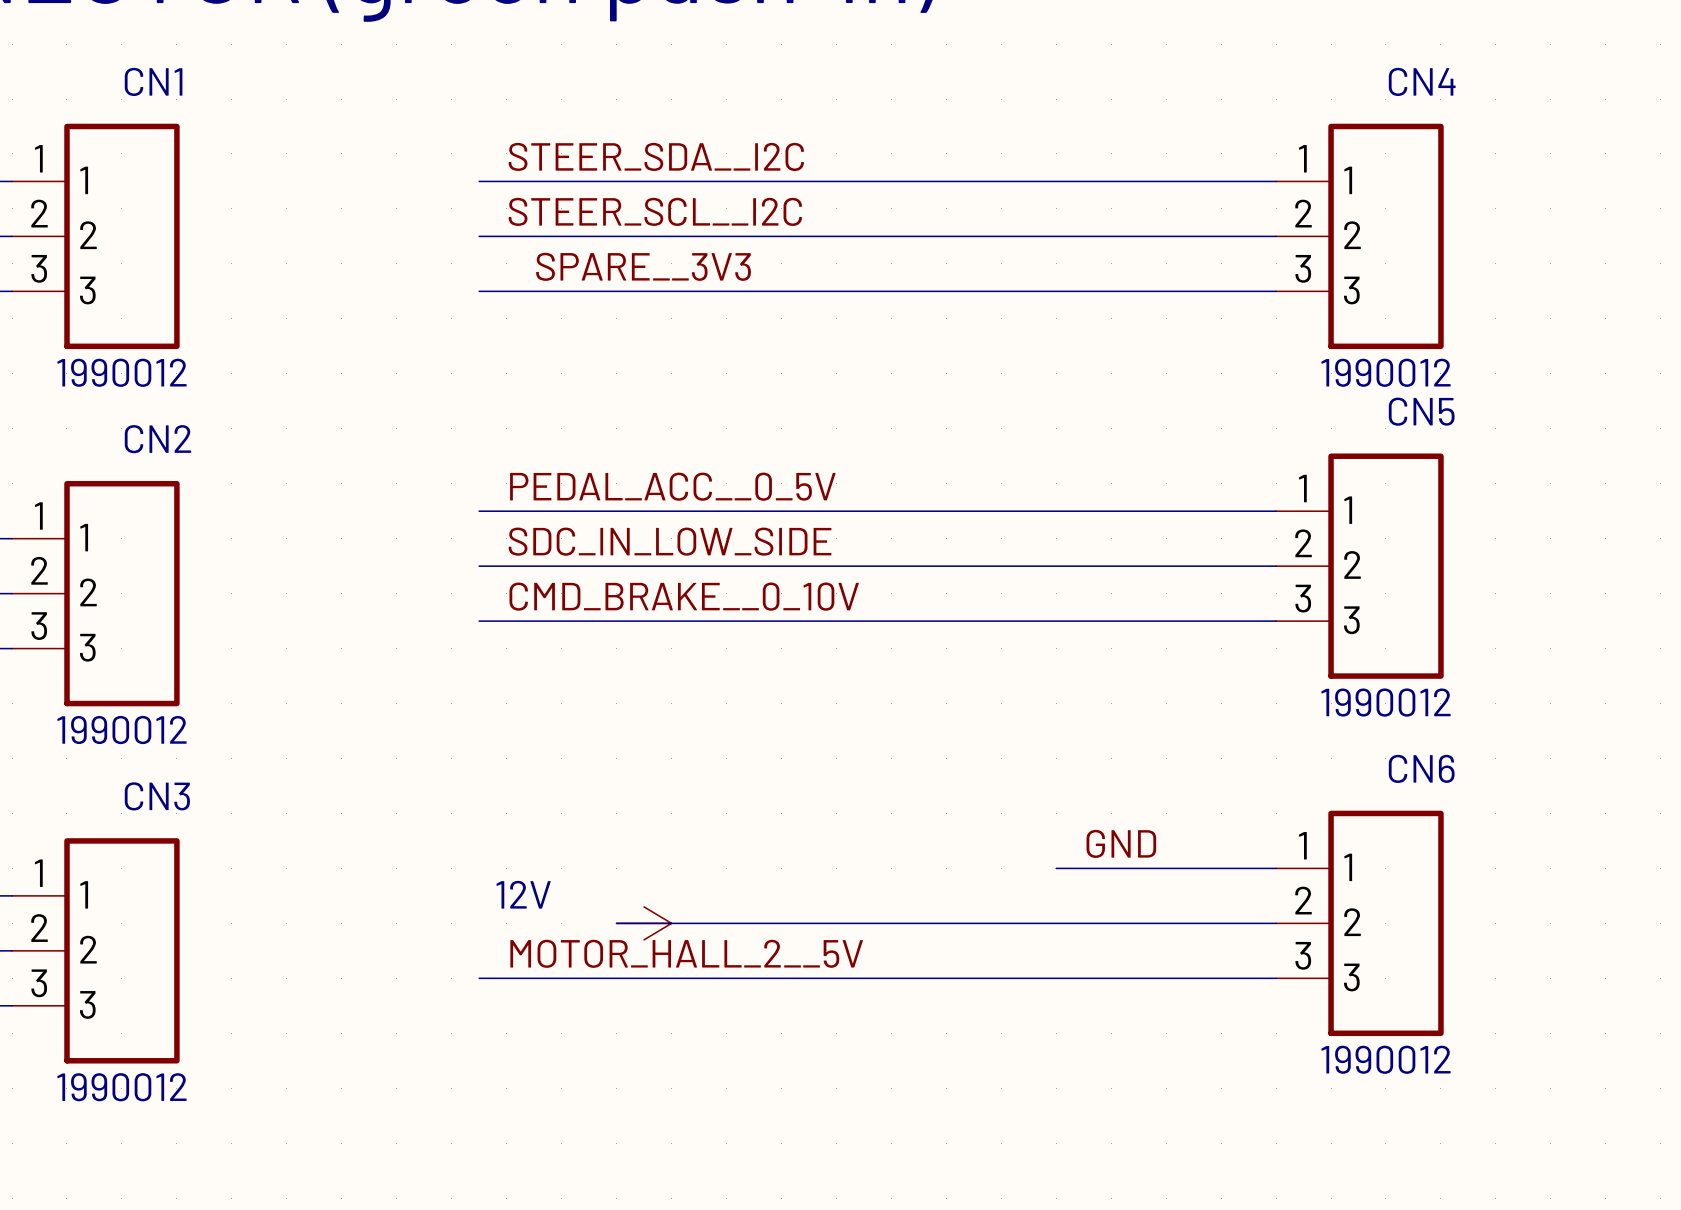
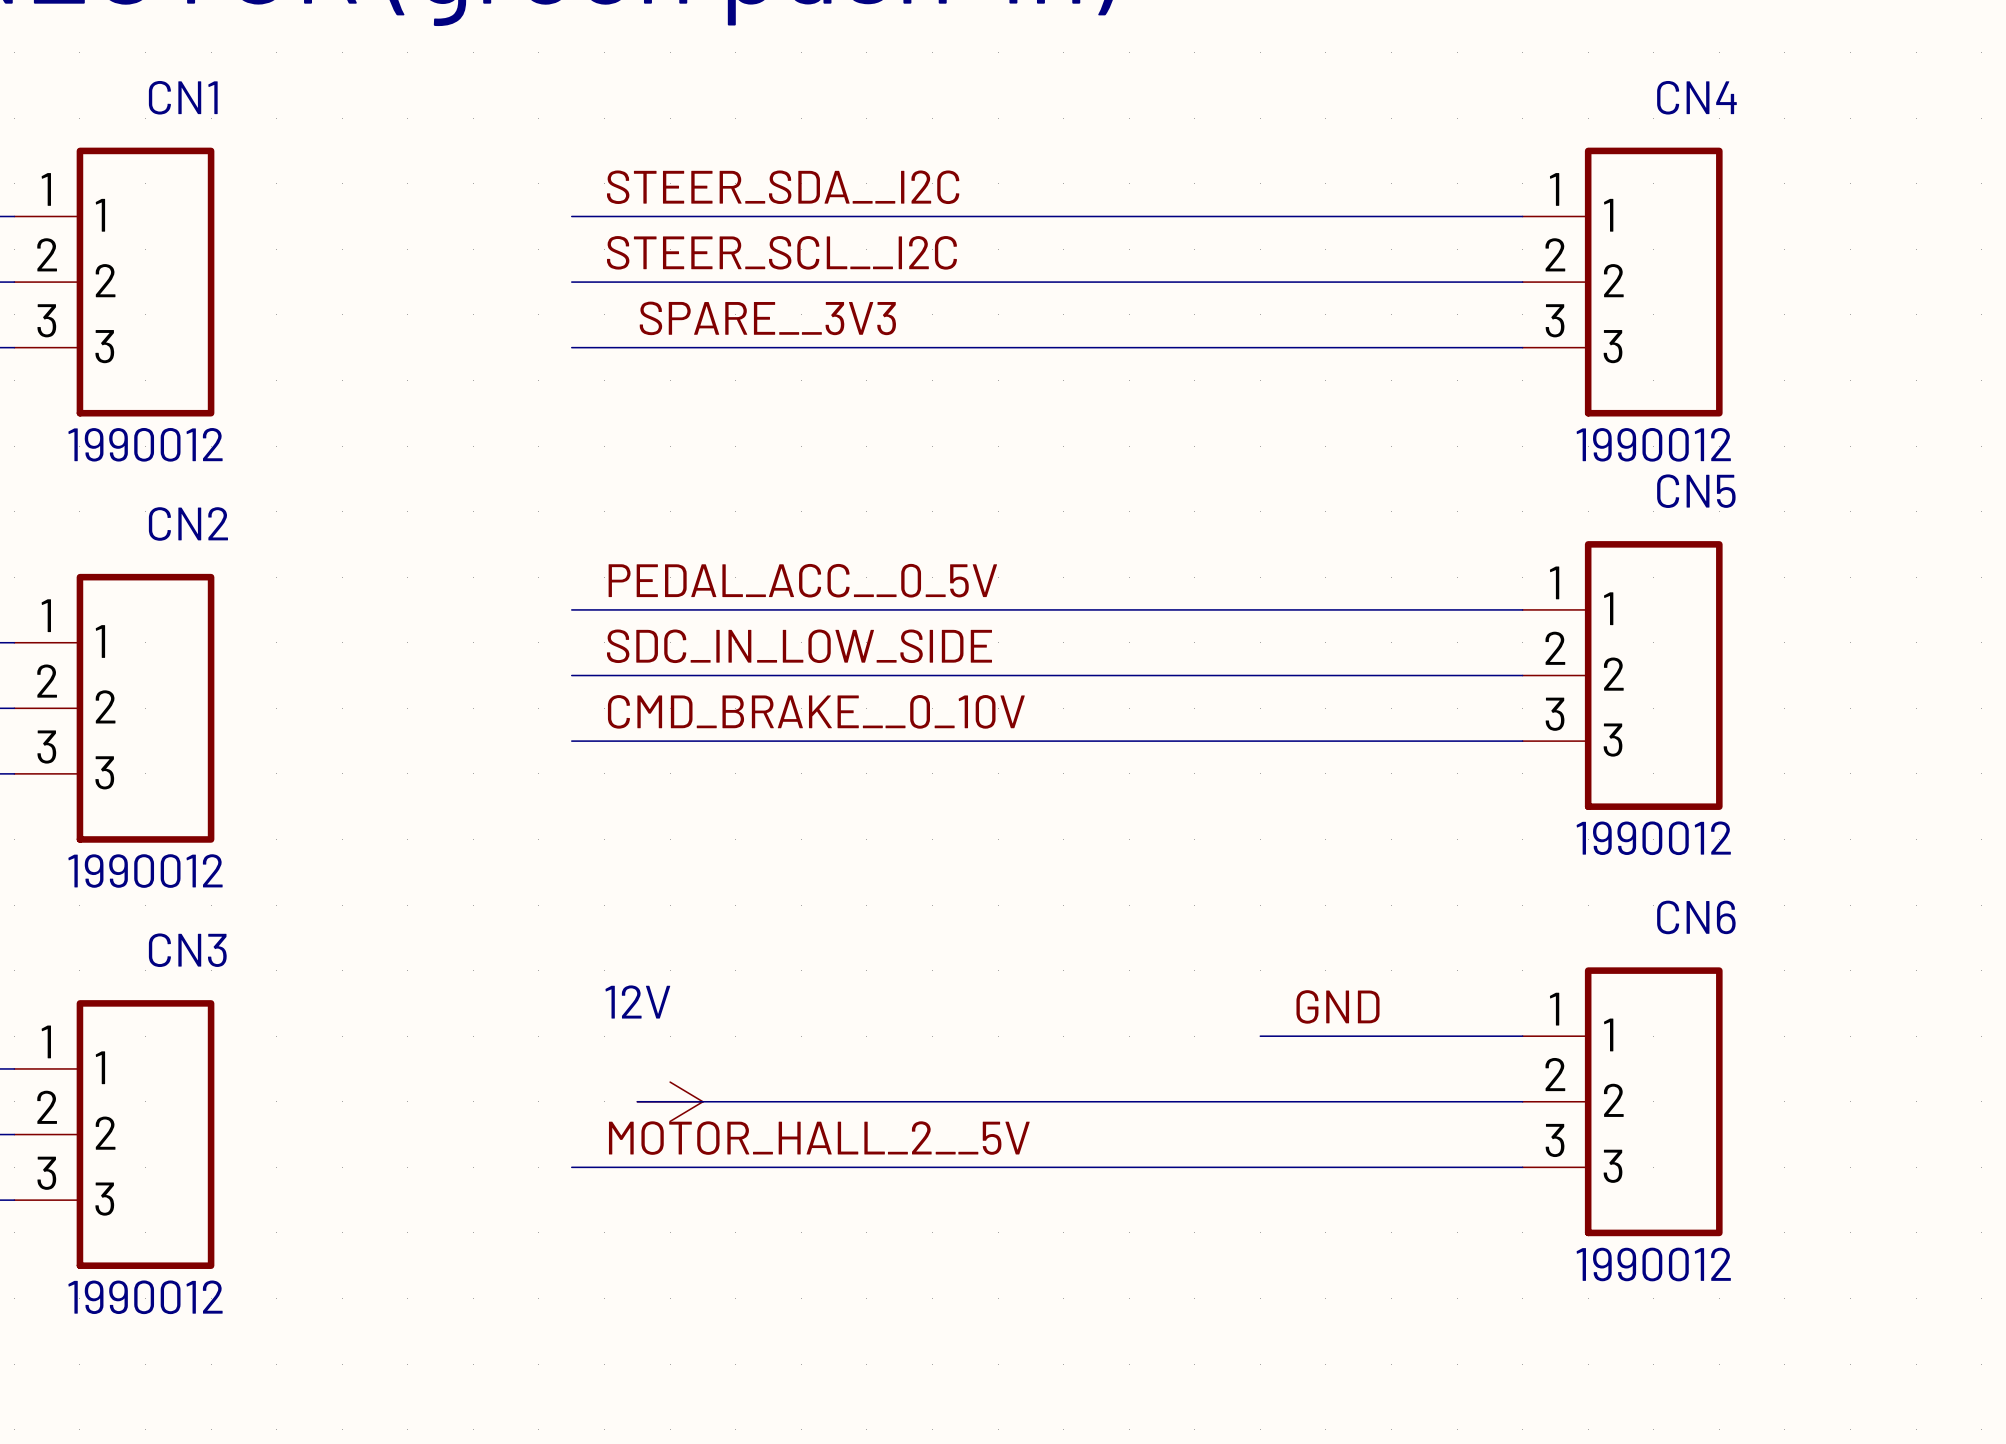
power symbol text position: 12V (523, 894) -> 12V (637, 1001)
wire: none -> (637, 1101) (735, 1101)
power symbol position: 12V (644, 923) -> 12V (670, 1101)

